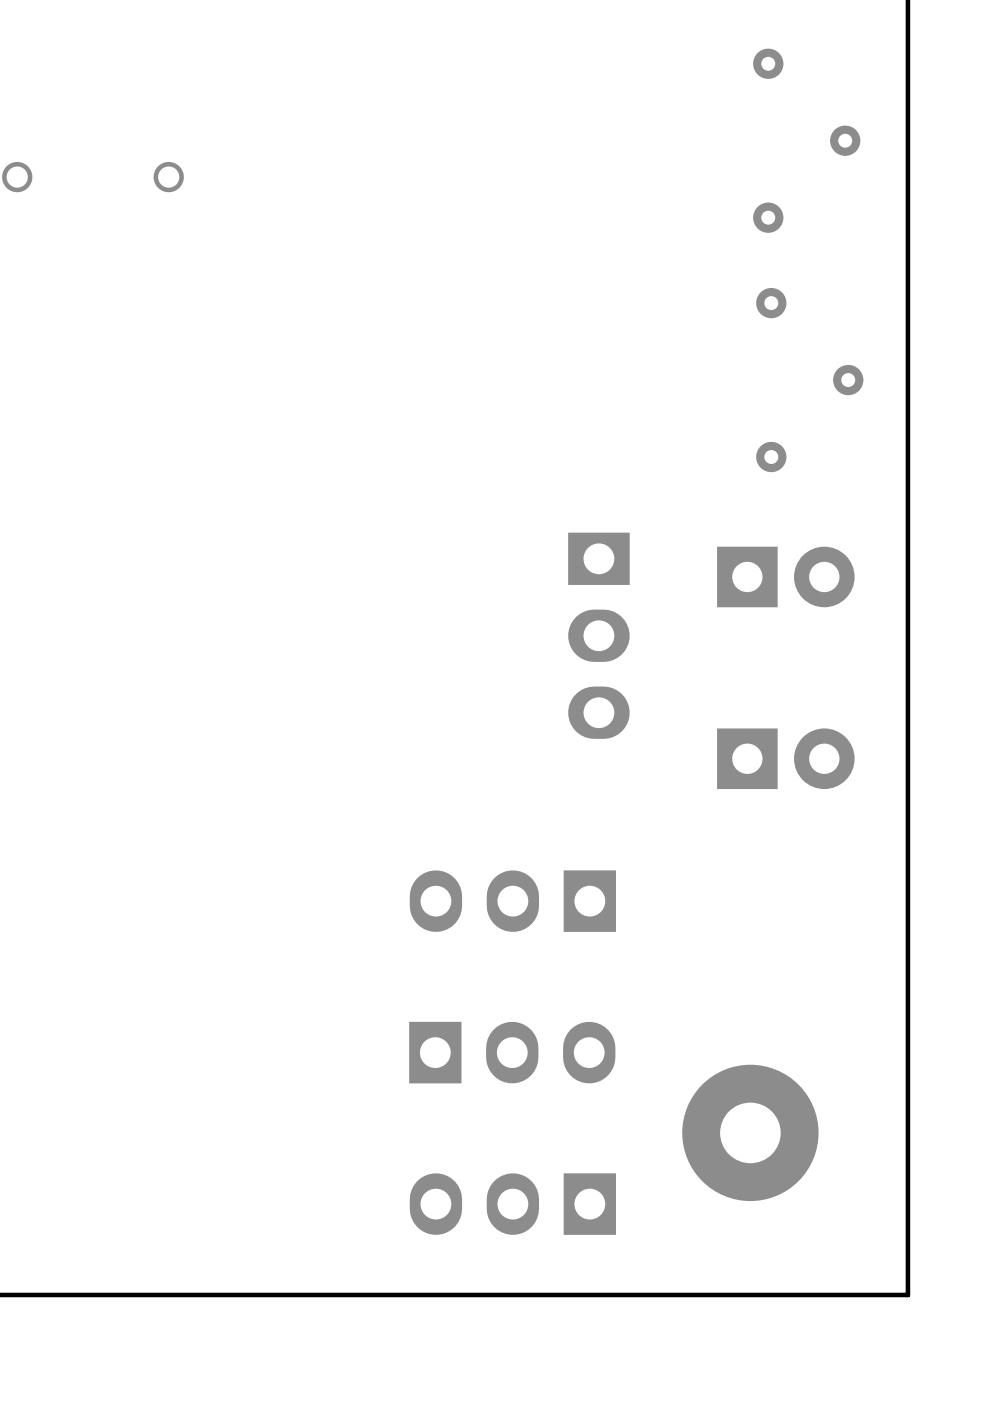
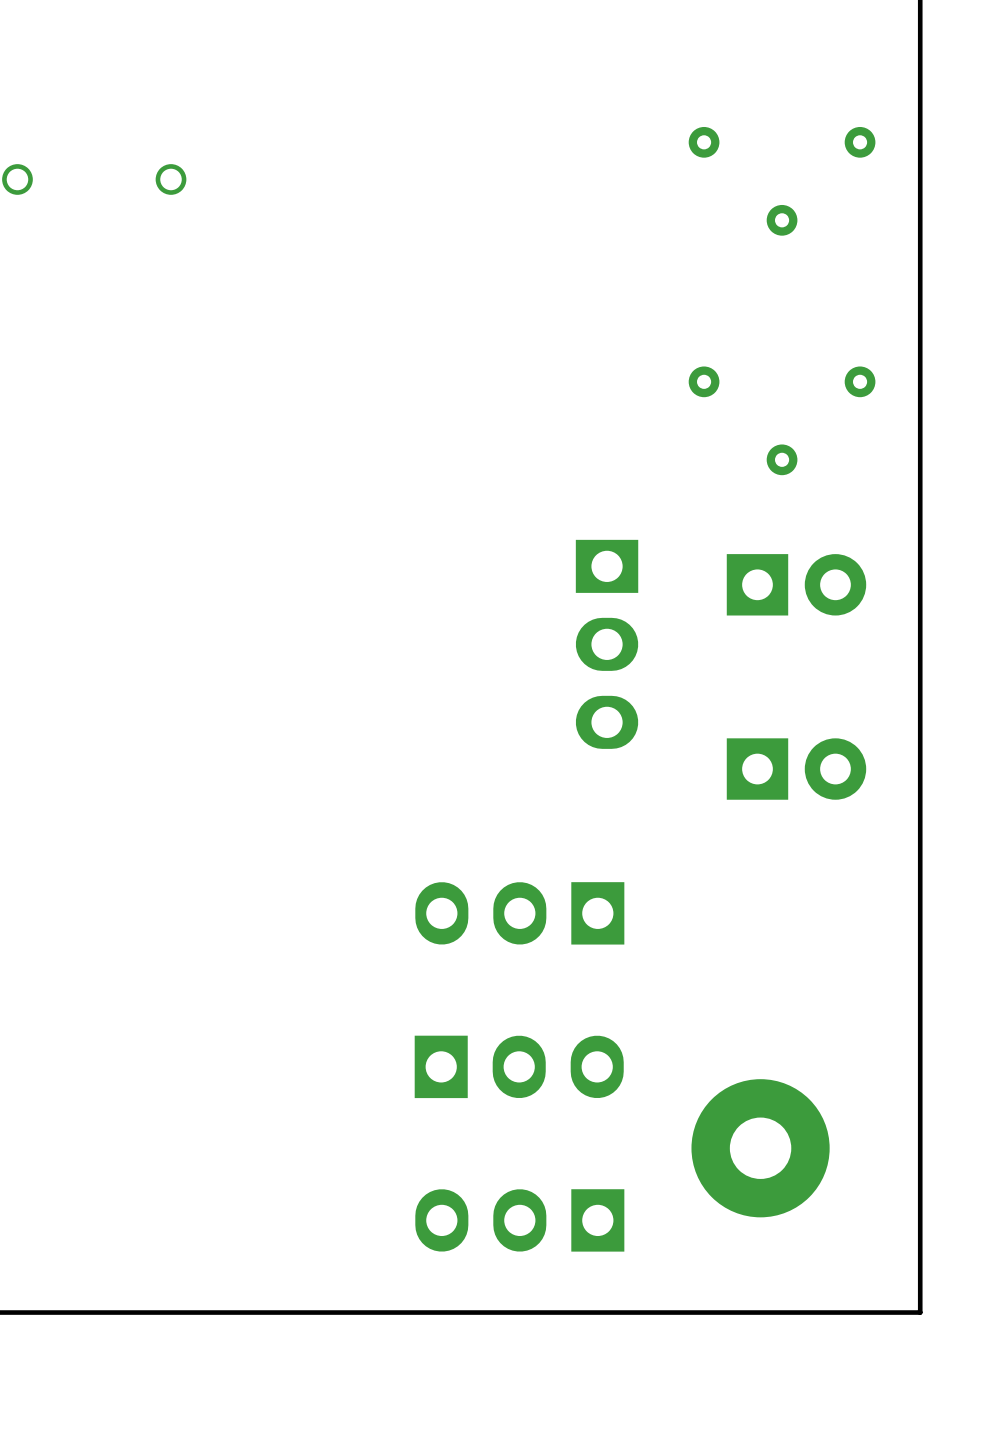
part rotation: 0° (806, 140) -> 90° clockwise (782, 181)
part rotation: 0° (809, 380) -> 90° clockwise (782, 420)

